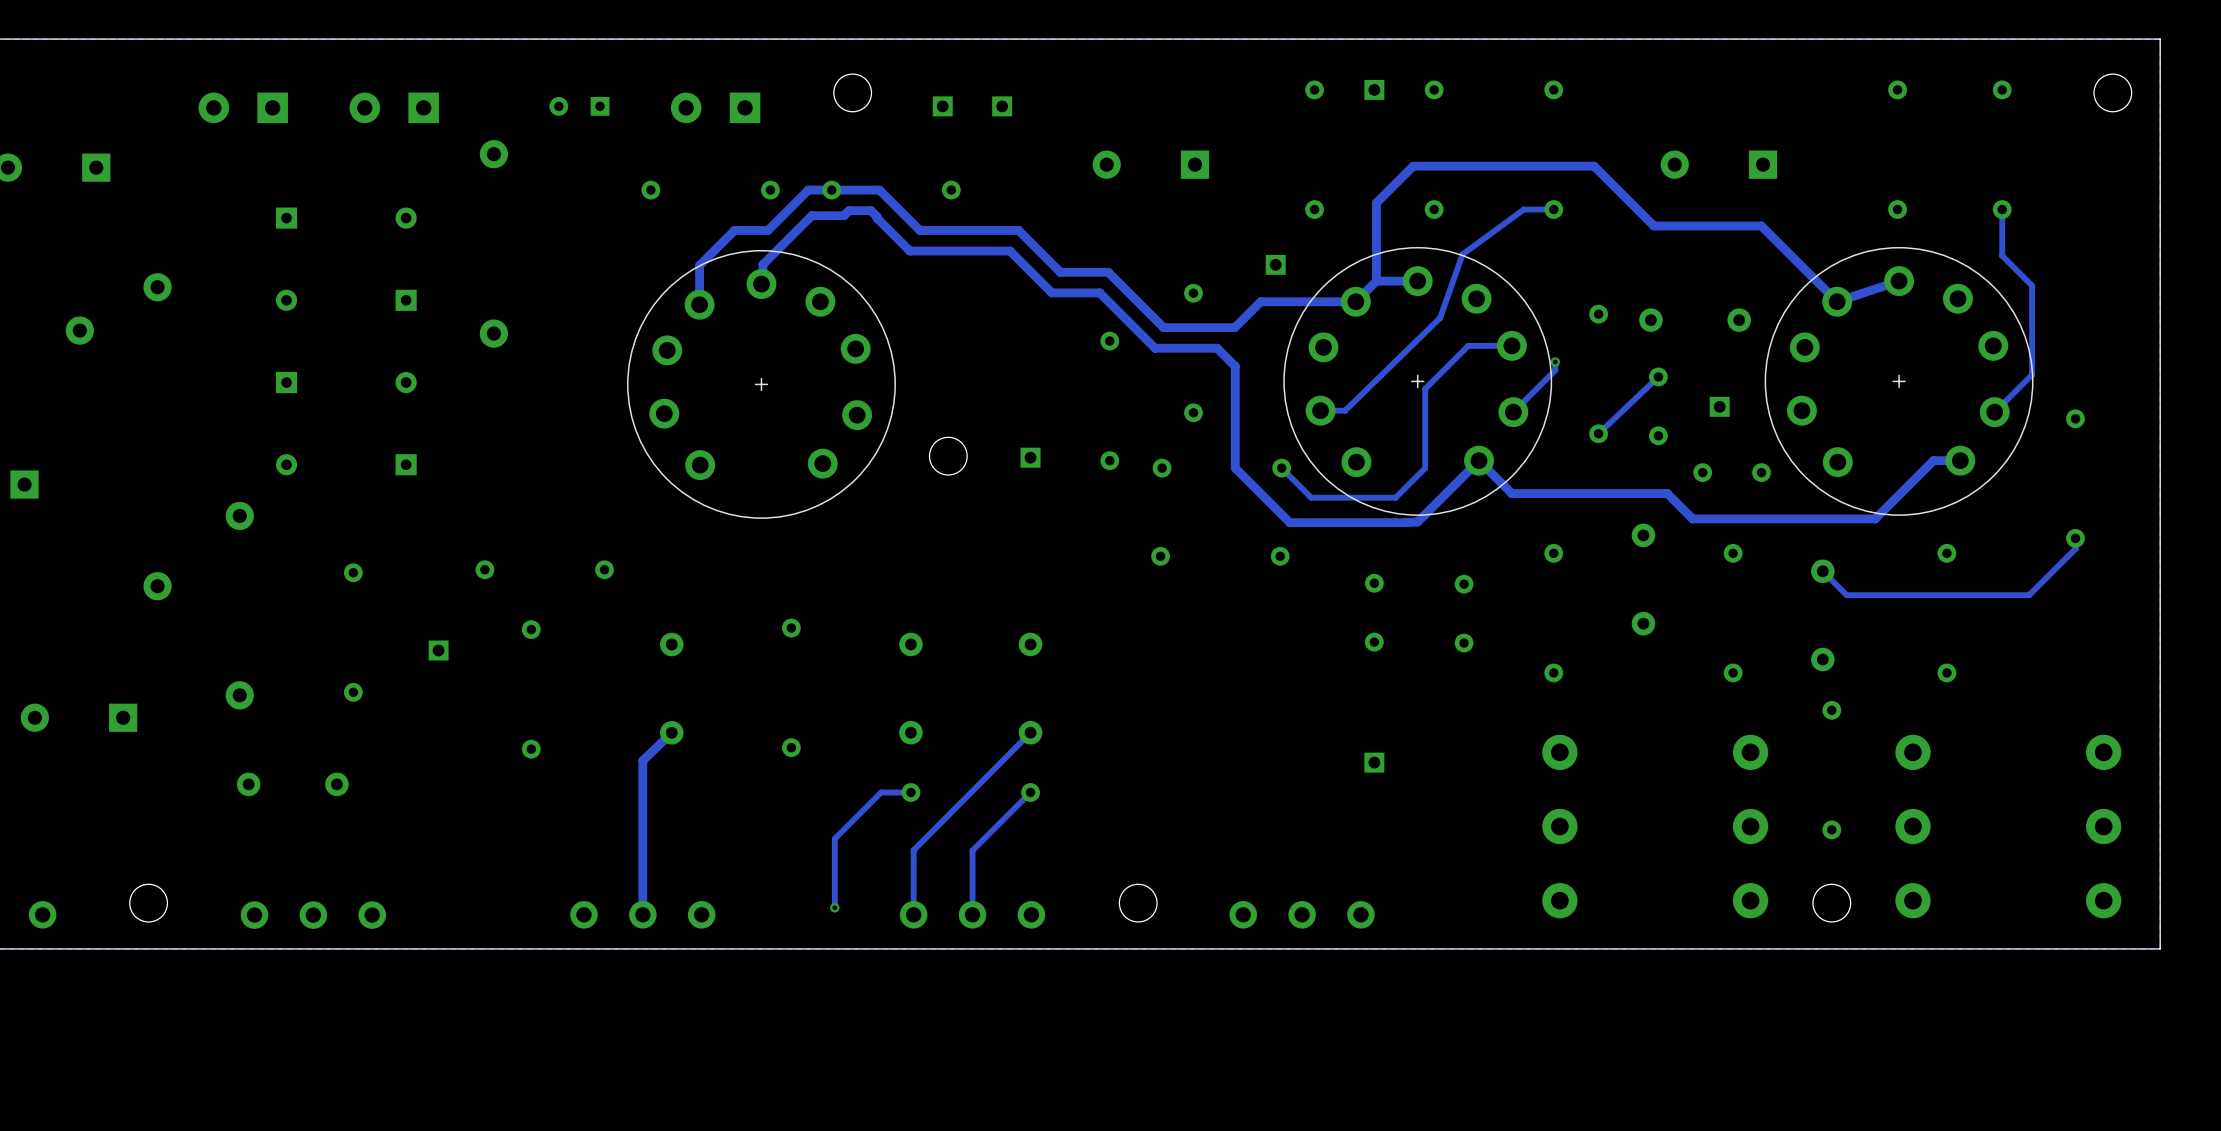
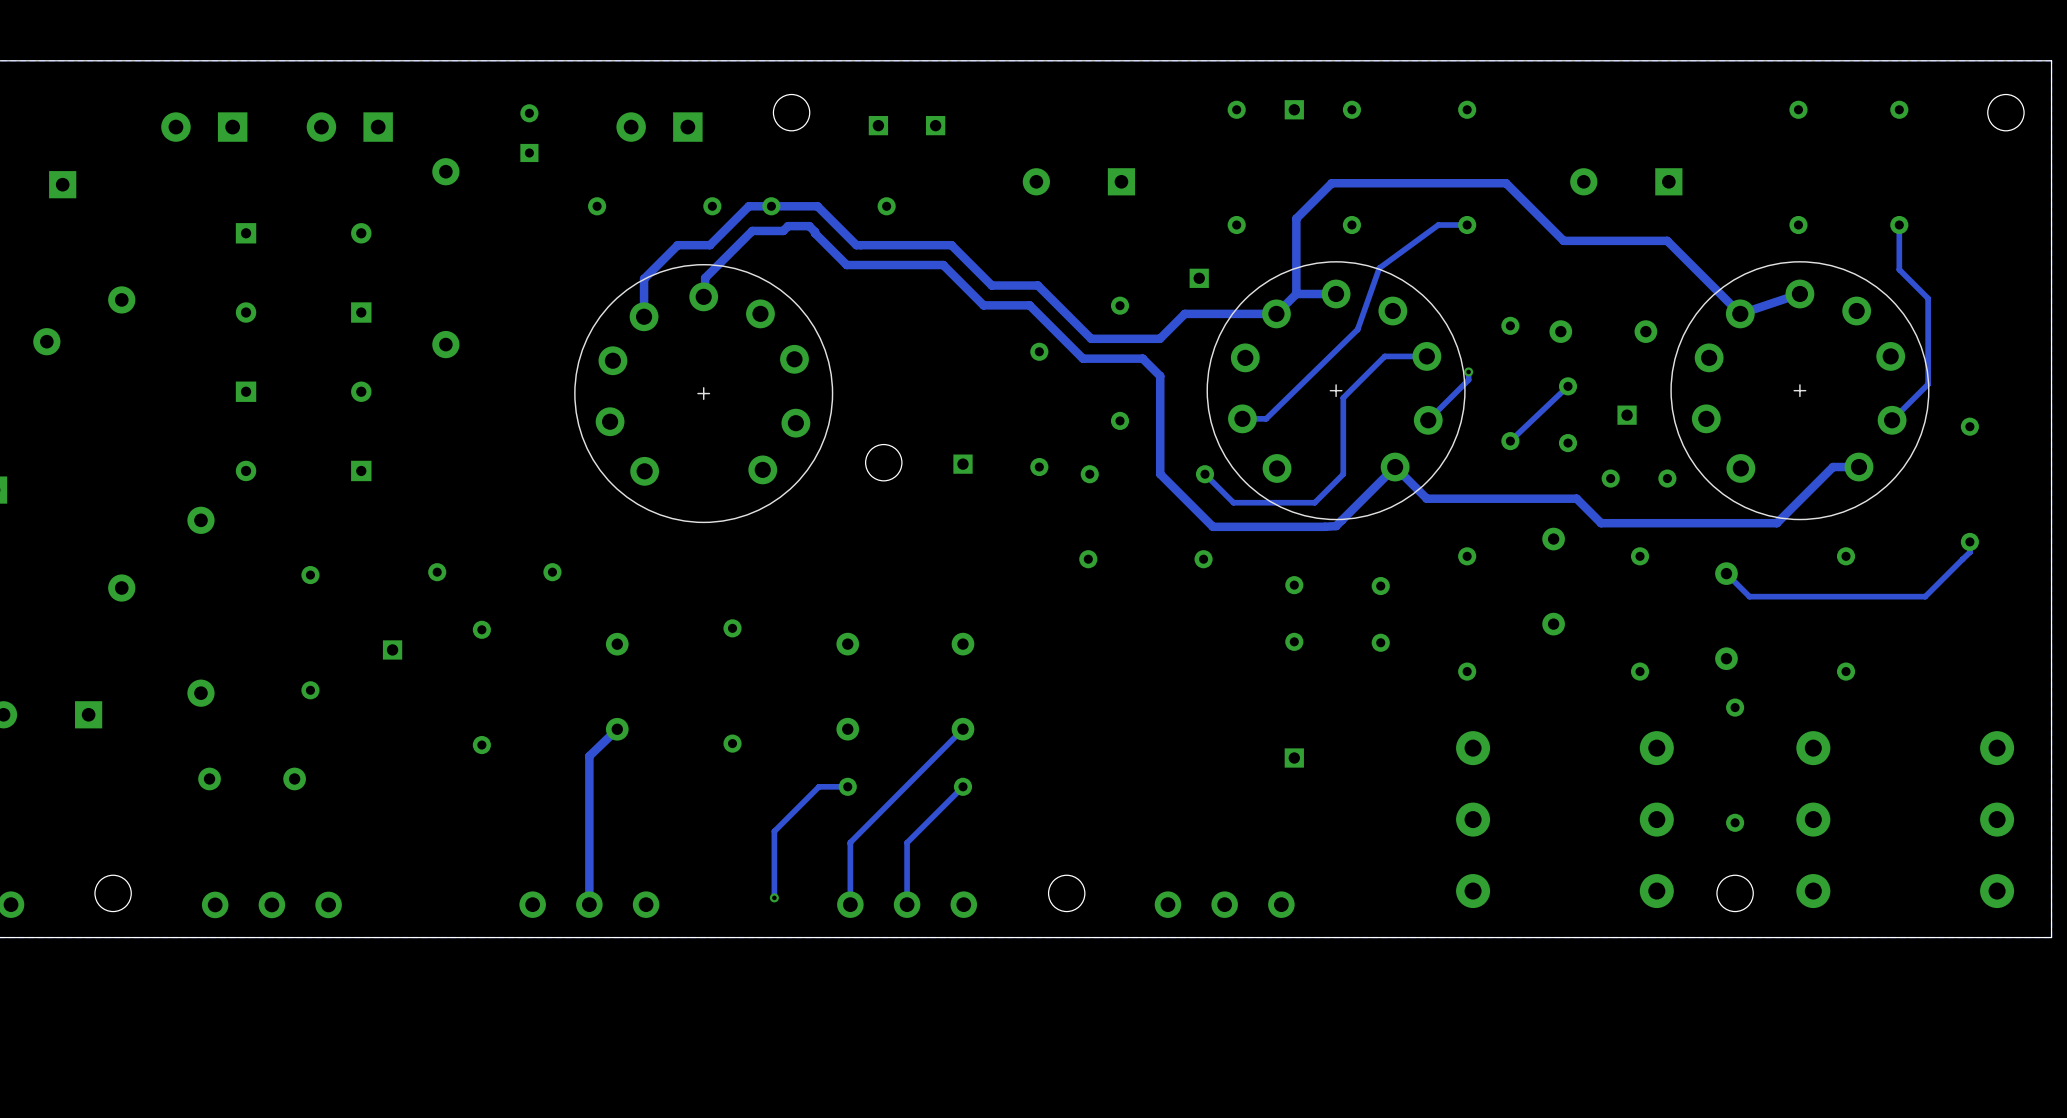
part rotation: 0° (579, 106) -> 90° clockwise (529, 133)

